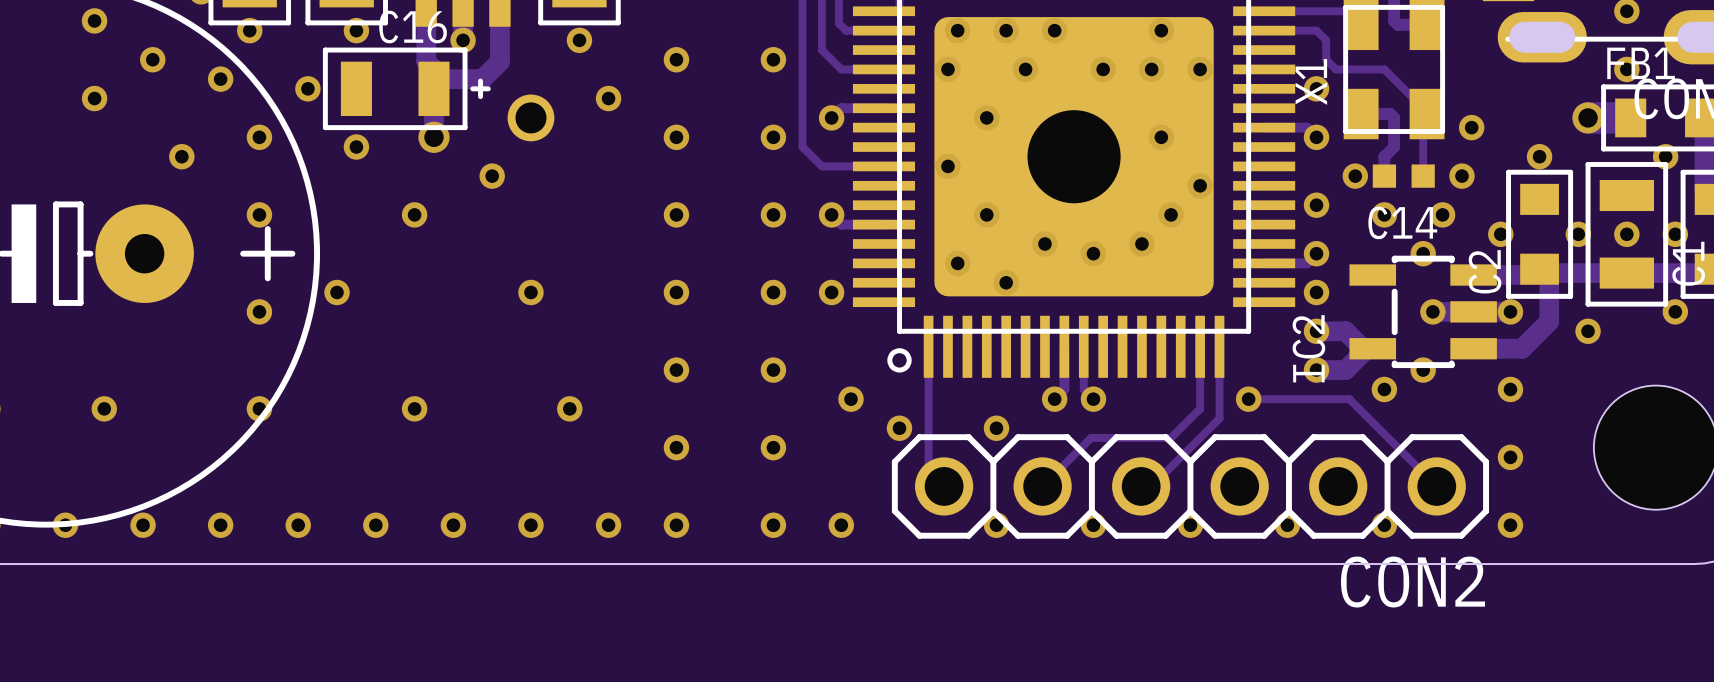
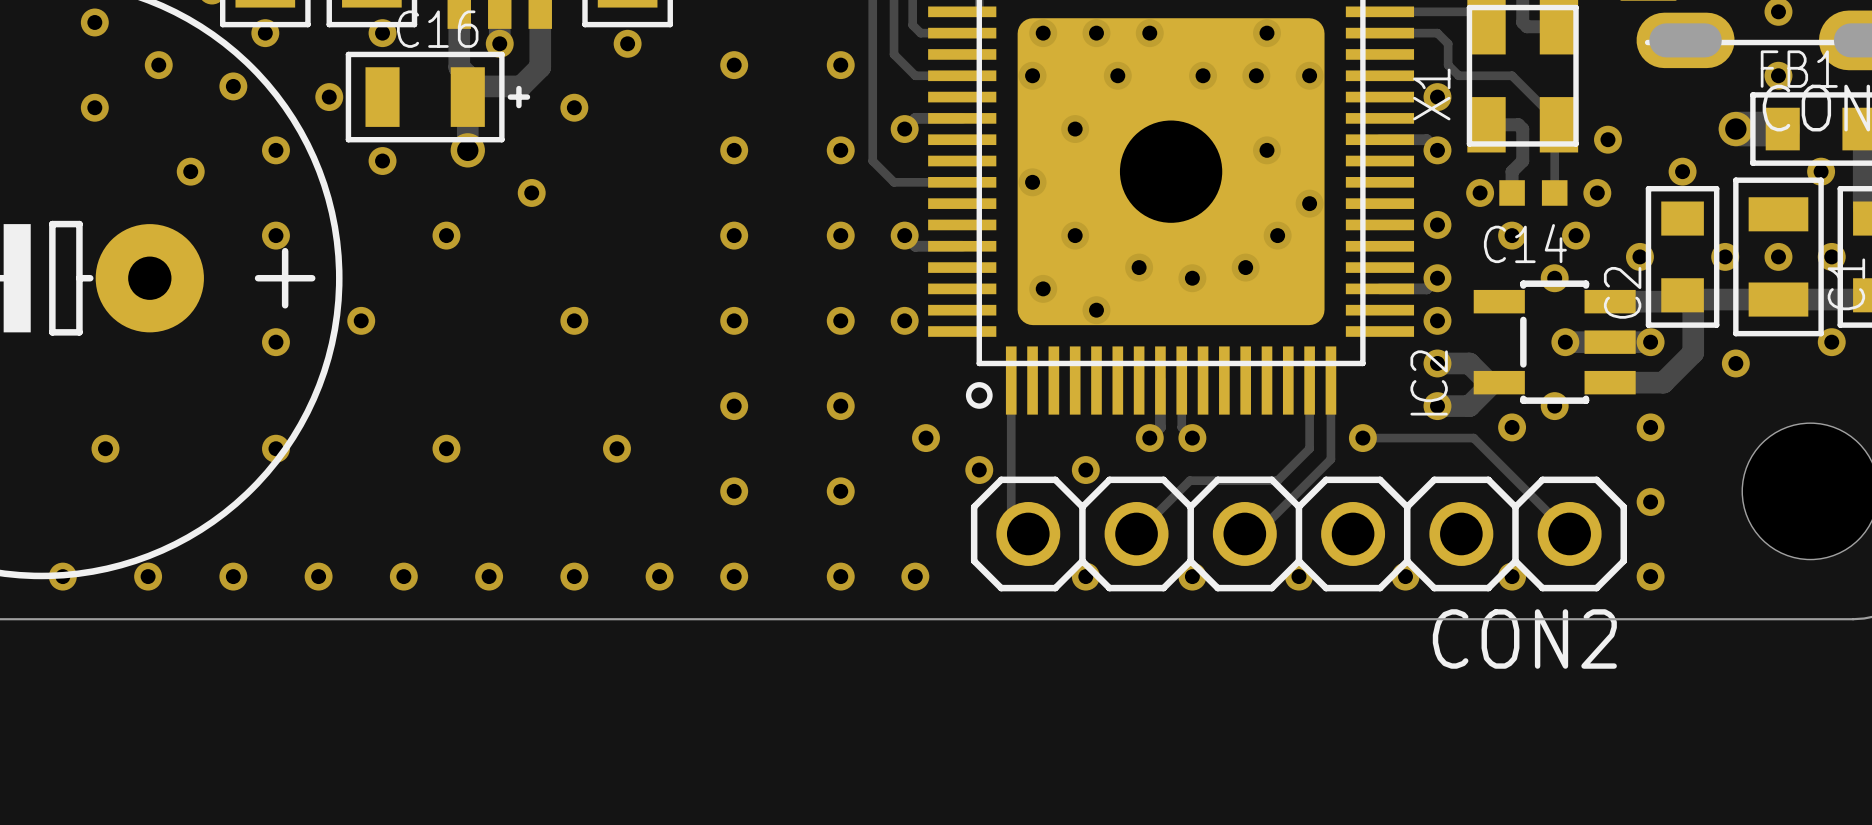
via position: (608, 98) -> (574, 107)
part: (530, 117) -> none

